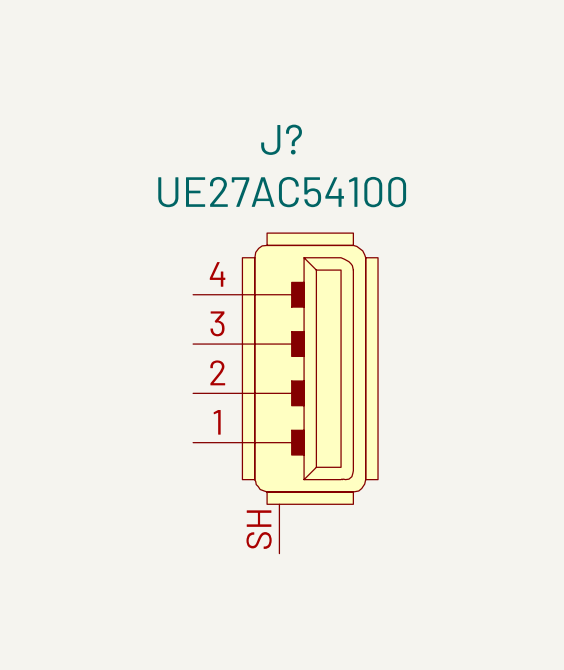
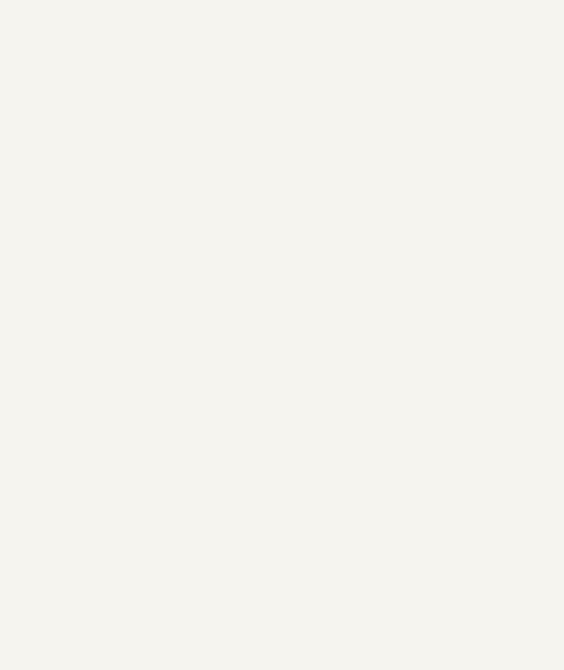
J?: UE27AC54100 (285, 393) -> none

